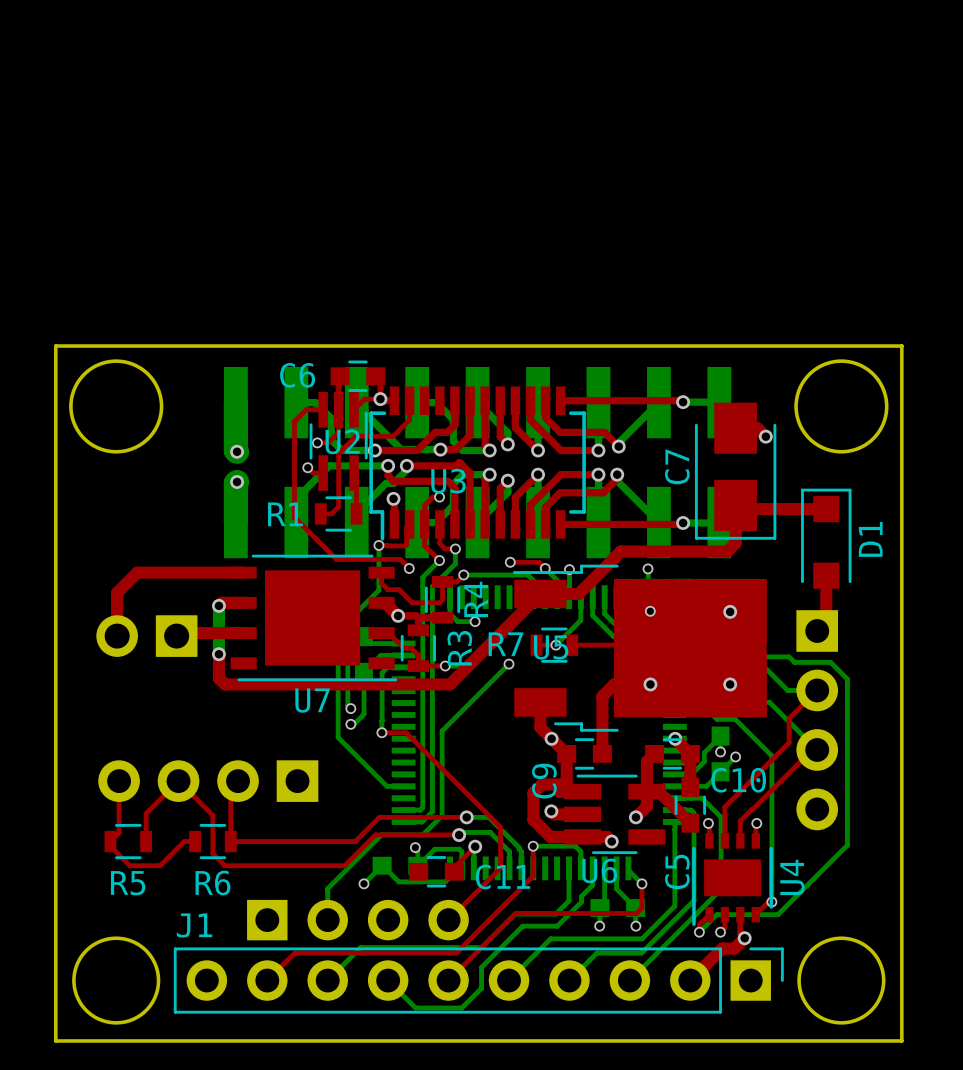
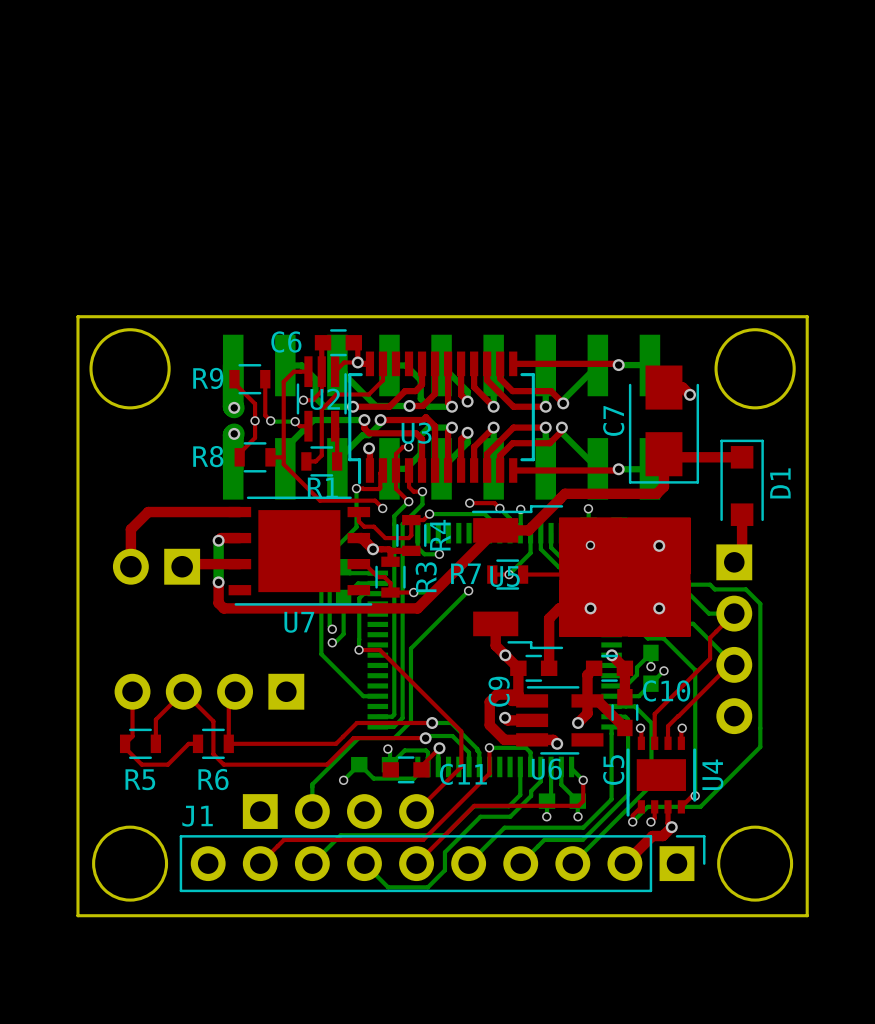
top track: none -> (234, 379) (234, 383) (255, 403) (255, 437) (239, 453) (239, 457)
R9: none -> (249, 379)
top track: none -> (265, 379) (265, 415) (270, 420)
via: none -> (255, 420)
bottom track: none -> (270, 420) (295, 421)
via: none -> (270, 420)
R8: none -> (255, 457)
top track: none -> (270, 457) (283, 457)
R1 name position: R1 (285, 514) -> R1 (322, 487)

